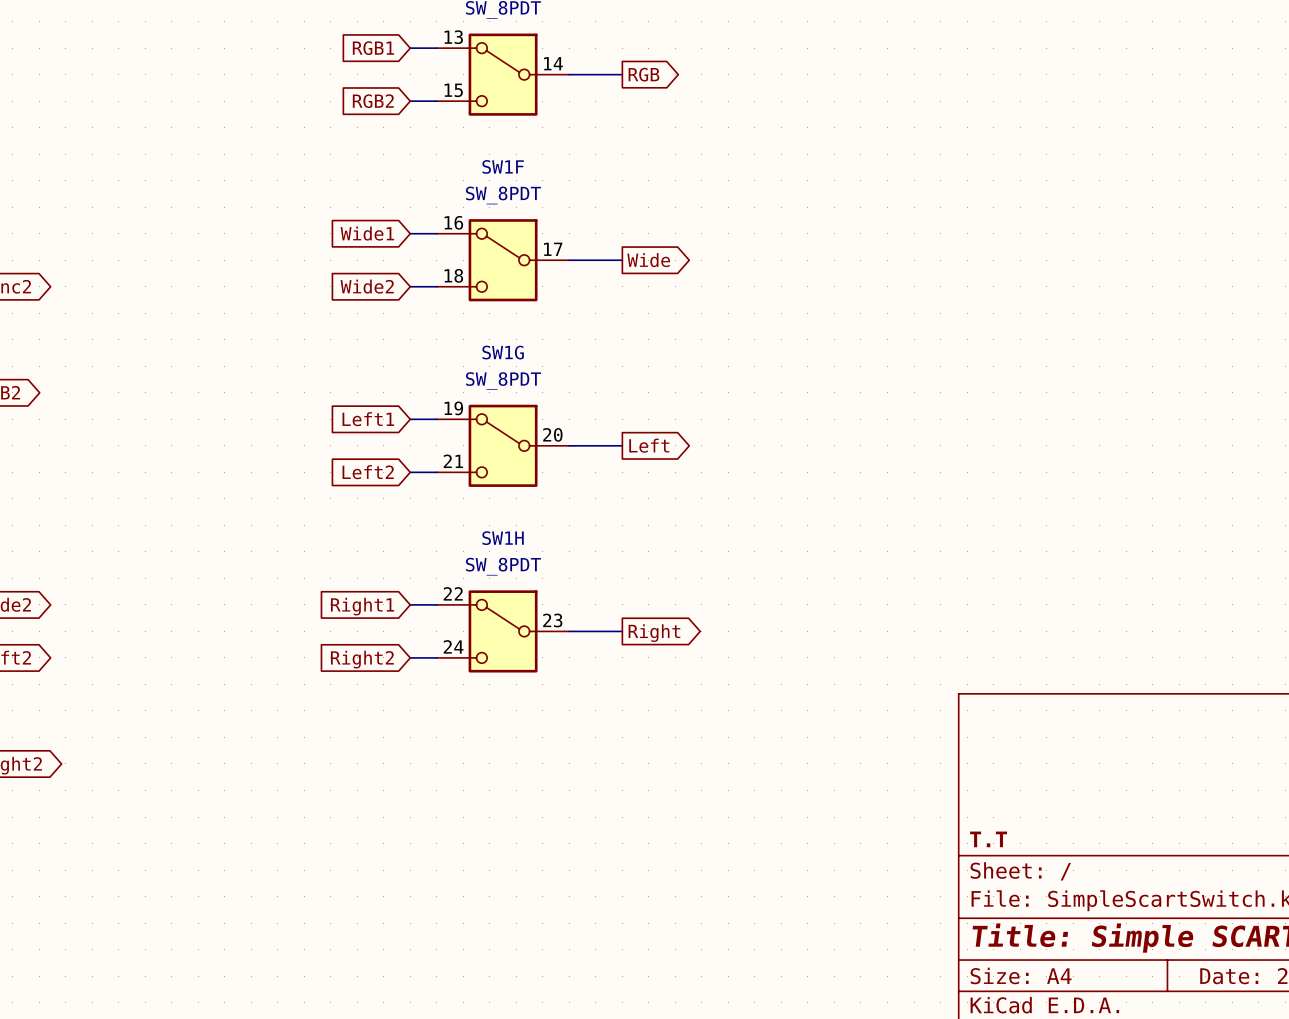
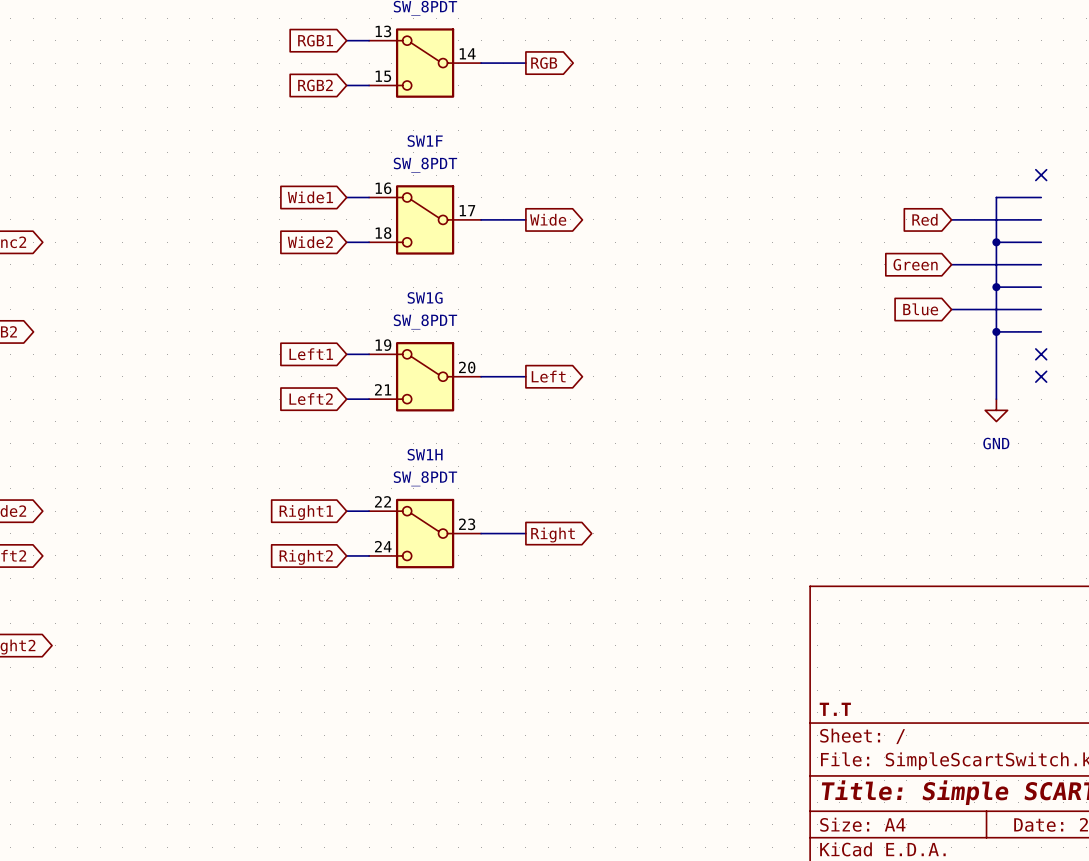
no-connect mark: none -> (1041, 175)
wire: none -> (1041, 197) (996, 197) (996, 399)
global label: none -> Red (924, 219)
wire: none -> (951, 219) (1041, 219)
wire: none -> (996, 242) (1041, 242)
junction: none -> (996, 242)
global label: none -> Green (915, 264)
wire: none -> (951, 264) (1041, 264)
wire: none -> (996, 287) (1041, 287)
junction: none -> (996, 287)
global label: none -> Blue (920, 309)
wire: none -> (951, 309) (1041, 309)
wire: none -> (996, 331) (1041, 331)
junction: none -> (996, 331)
no-connect mark: none -> (1041, 354)
no-connect mark: none -> (1041, 376)
power symbol: none -> GND (996, 410)

